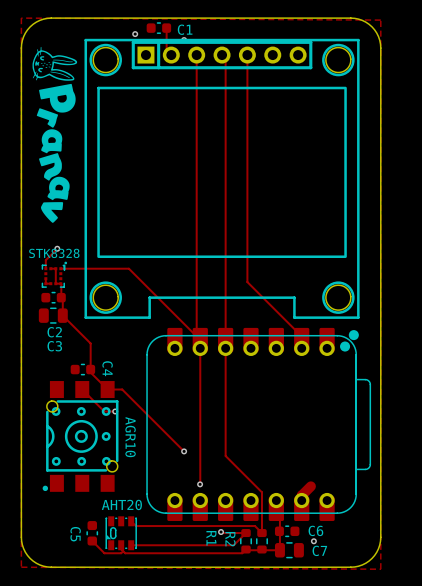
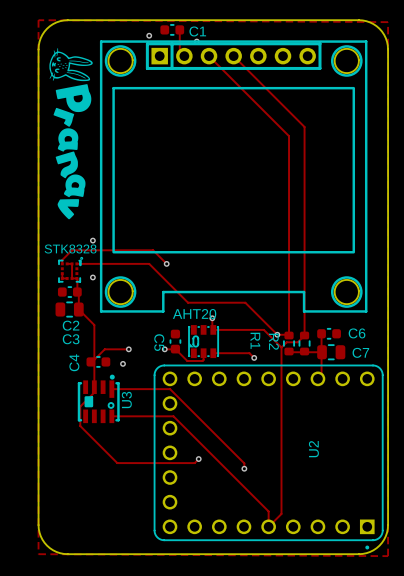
track: (196, 55) (196, 344) (200, 348) (200, 484) -> (209, 56) (289, 136) (289, 335) (277, 334) (245, 302) (188, 302) (149, 263) (143, 263)
track: (247, 55) (247, 282) (301, 336) (301, 340) -> none
track: (225, 58) (225, 456) (261, 492) (261, 533) (254, 526) (135, 526) (131, 521) -> (237, 59) (304, 127) (304, 335) (297, 342) (286, 342) (281, 347)
via: none -> (92, 240)
track: (57, 248) (45, 260) (45, 264) -> (166, 263) (153, 250) (72, 250) (62, 259)
via: (57, 248) -> none
track: (128, 268) (200, 340) -> none
via: none -> (166, 263)
via: none -> (92, 277)
track: none -> (212, 318) (213, 329) (263, 329) (281, 347)
via: none -> (212, 318)
track: (78, 331) (90, 343) (90, 372) (107, 389) (122, 389) (184, 451) -> (94, 325) (94, 392) (80, 406) (80, 426) (117, 463) (194, 463) (198, 459)
track: none -> (321, 333) (321, 375) (317, 378)
via: none -> (277, 334)
track: none -> (281, 347) (281, 513) (268, 526) (268, 511) (173, 416) (111, 416)
track: none -> (128, 349) (104, 349) (92, 361)
via: none -> (128, 349)
track: none -> (164, 349) (175, 349) (187, 360) (202, 360) (203, 353)
via: none -> (164, 349)
track: none -> (289, 351) (322, 352)
track: none -> (213, 353) (249, 353) (254, 357)
via: none -> (254, 357)
C4 name rotation: 0° (107, 368) -> 180° (74, 362)
C4 name position: C4 (107, 368) -> C4 (74, 362)
via: none -> (123, 363)
track: (82, 389) (104, 411) (115, 411) -> none
track: none -> (111, 389) (170, 389) (244, 463) (244, 468)
U3: none -> (98, 398)
via: (115, 411) -> none
part: (258, 424) -> none
part: AGR10 (80, 436) -> none
via: (184, 451) -> none
U2: none -> (268, 457)
via: none -> (198, 459)
via: none -> (244, 468)
via: (200, 484) -> none
track: (310, 486) (301, 495) (301, 500) -> none
track: (276, 500) (279, 504) (279, 550) (246, 549) (242, 553) (125, 553) (121, 549) (121, 545) -> none
part value position: AHT20 (121, 504) -> AHT20 (194, 314)
C6 position: (287, 531) -> (329, 333)
track: (221, 532) (246, 533) (233, 545) (131, 545) -> none
via: (221, 532) -> none
C5 position: (92, 533) -> (175, 341)
part position: (121, 533) -> (203, 341)
track: (92, 541) (104, 553) (121, 553) (123, 551) -> none
R1 position: (246, 541) -> (289, 343)
R2 position: (261, 541) -> (304, 343)
via: (313, 541) -> none
C7 position: (289, 550) -> (331, 352)

